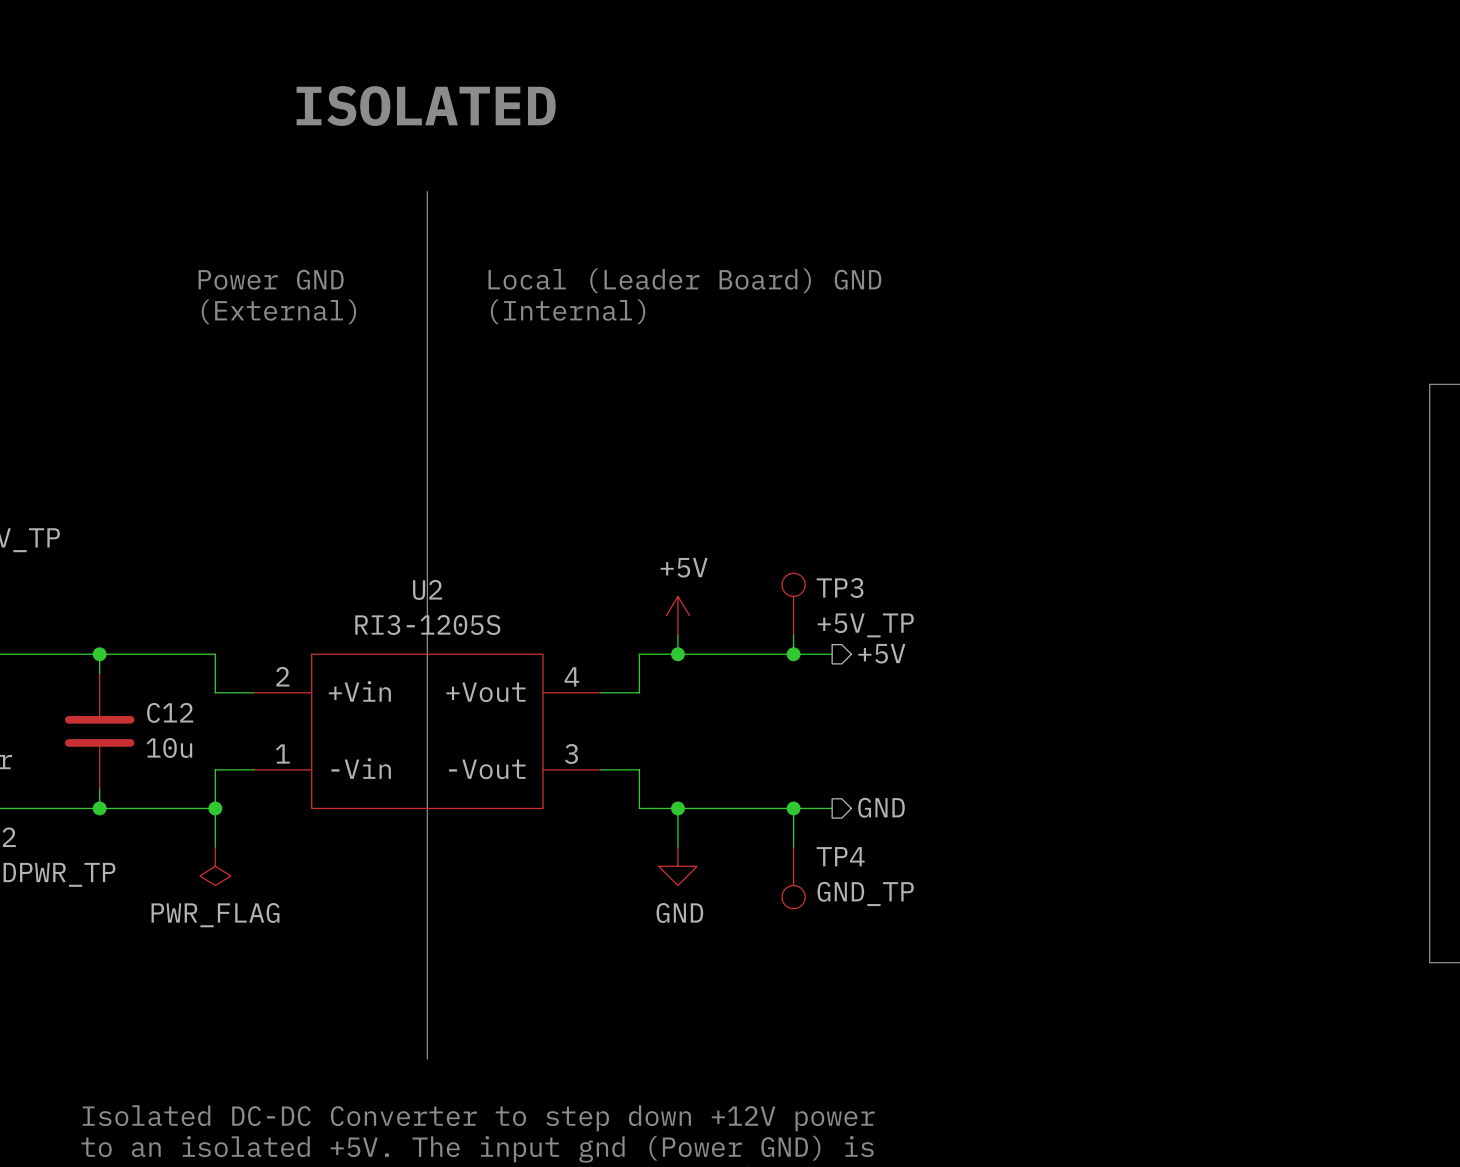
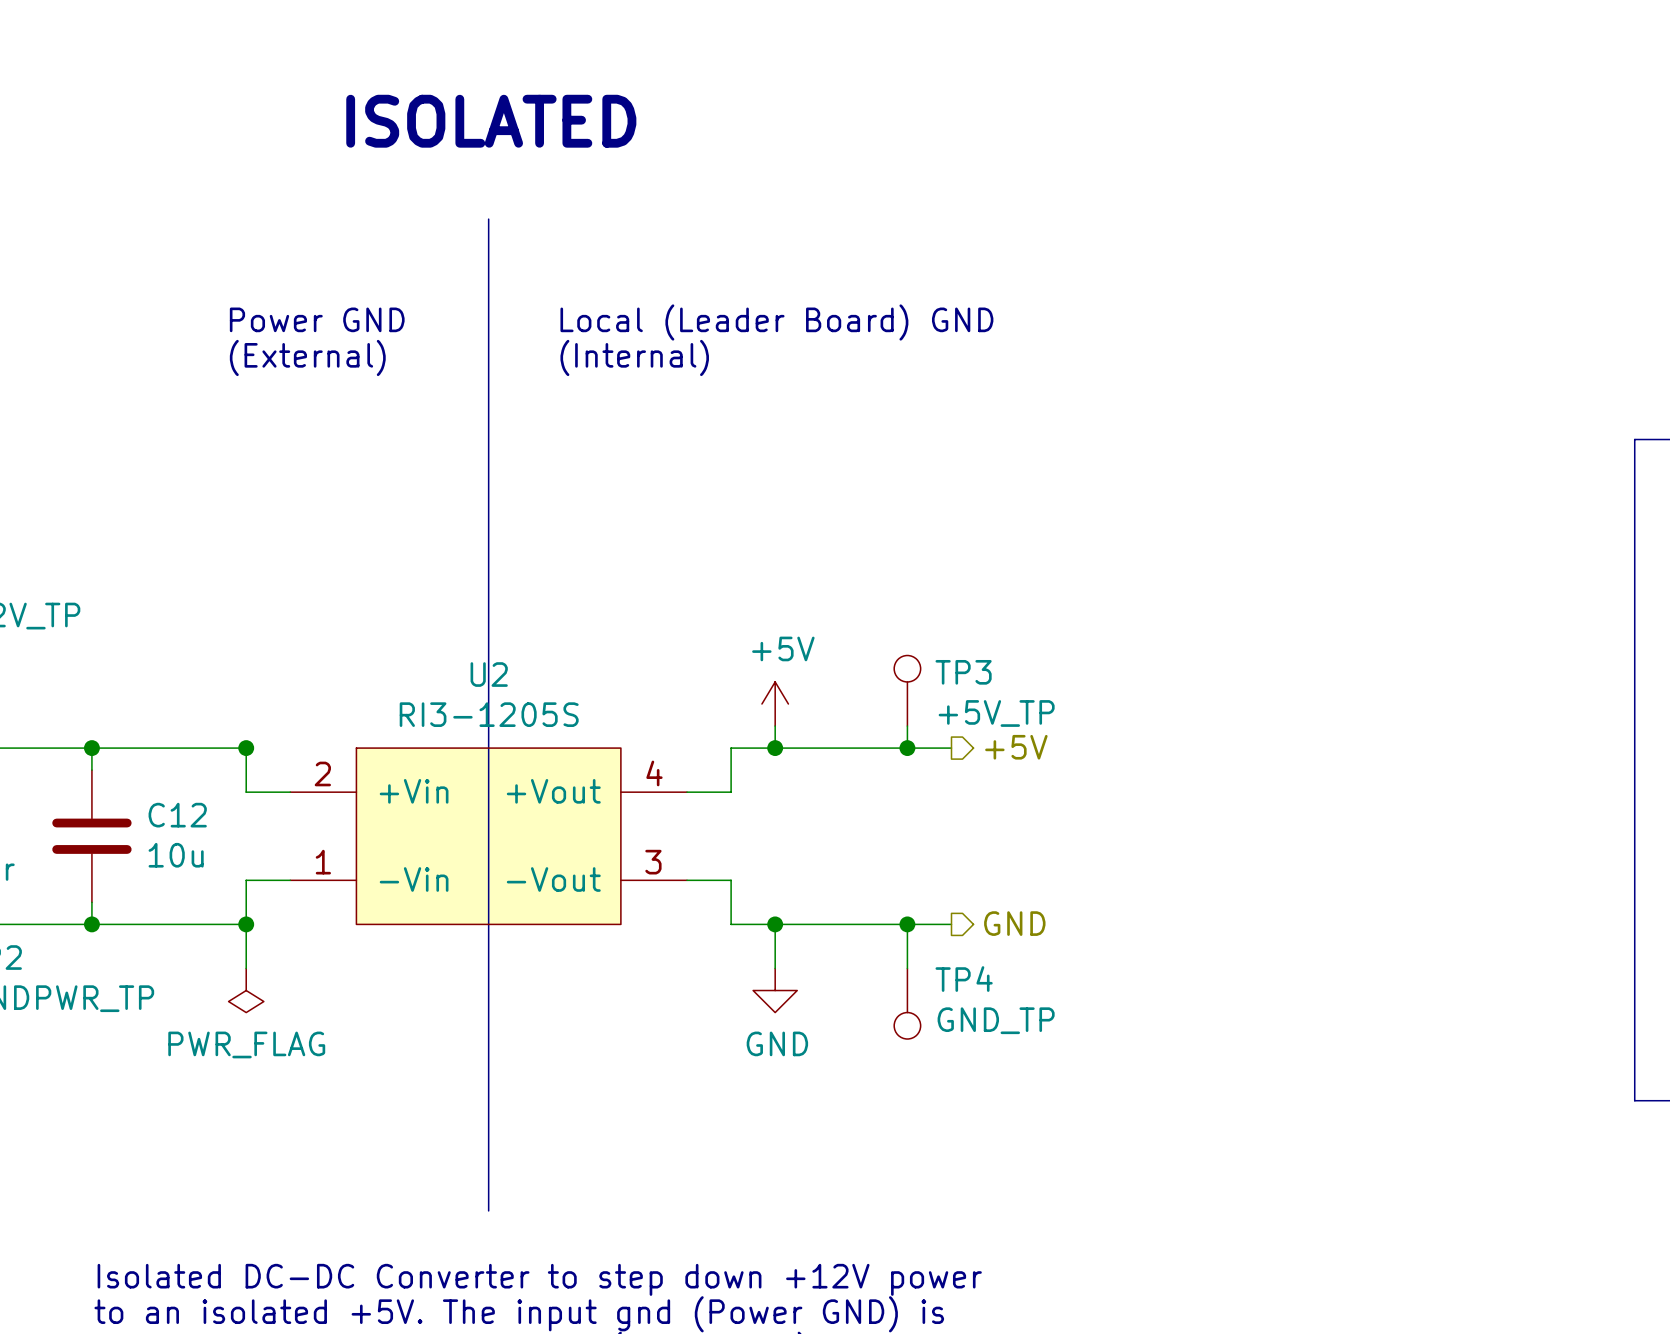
wire: (99, 654) (99, 673) -> (91, 748) (91, 770)
junction position: (99, 654) -> (91, 748)
junction: none -> (246, 748)
C12 position: (99, 731) -> (91, 836)
wire: (99, 789) (99, 808) -> (91, 902) (91, 924)
junction position: (99, 808) -> (91, 924)

